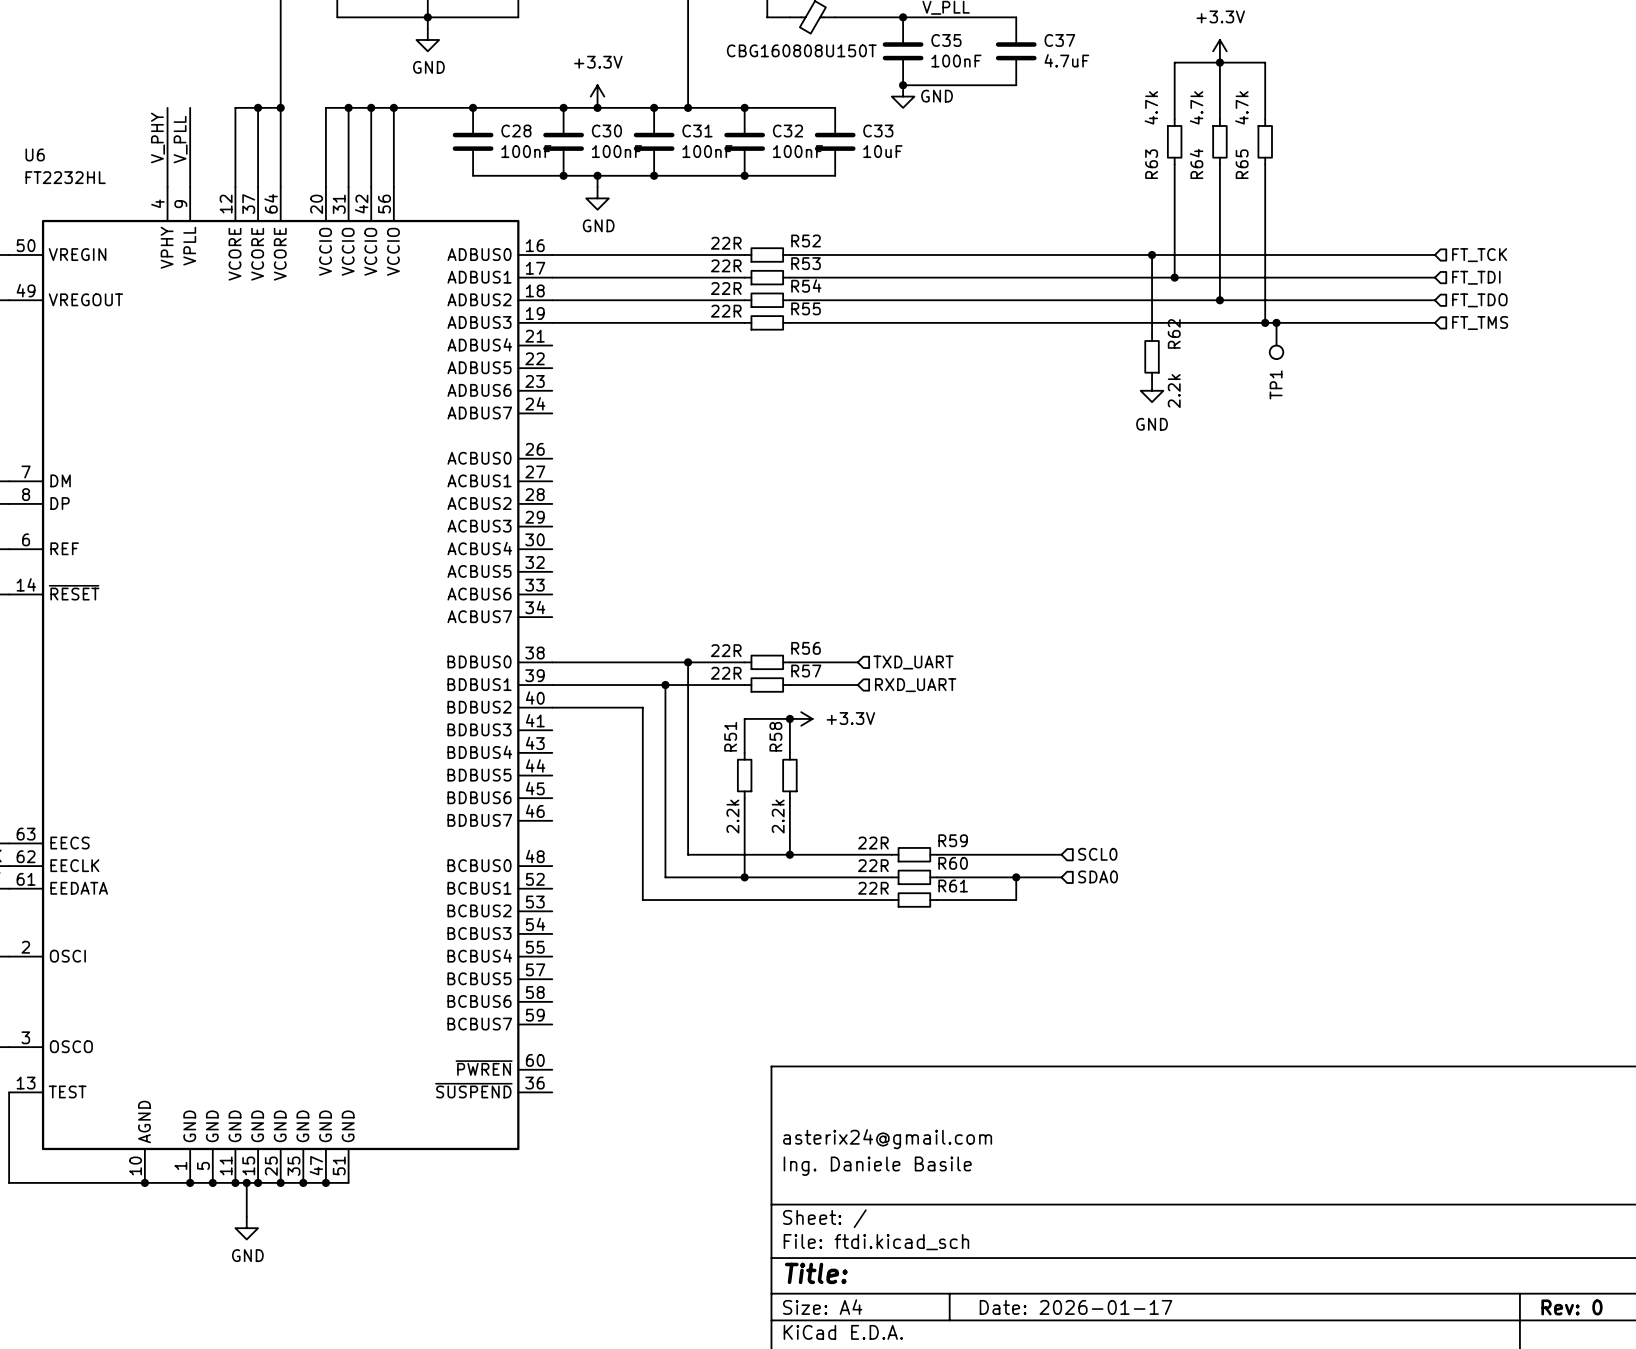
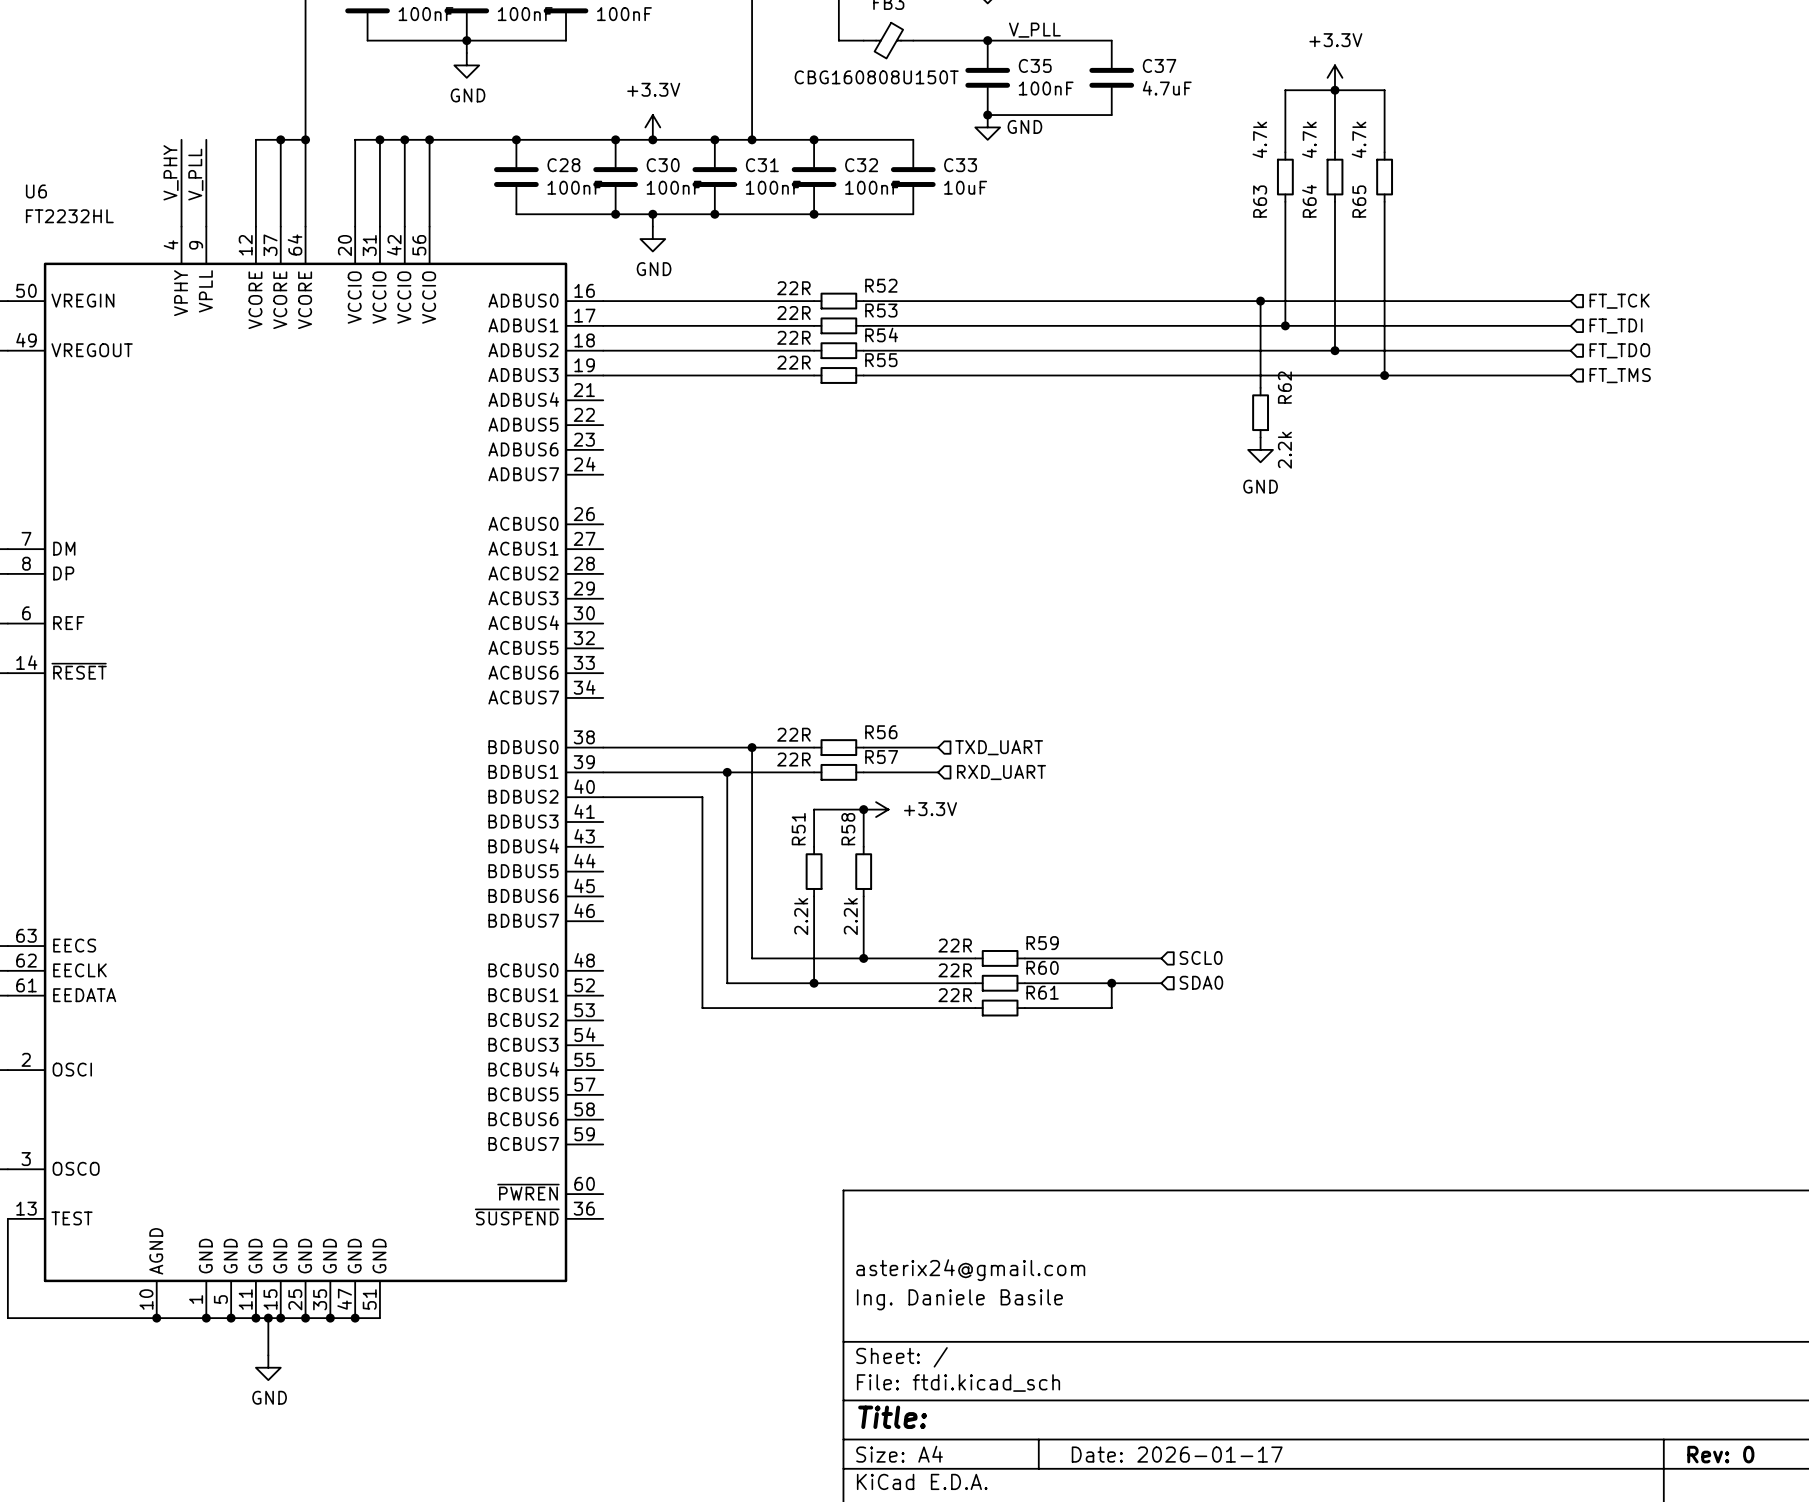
junction: (1276, 322) -> none
TP1: (1276, 341) -> none

